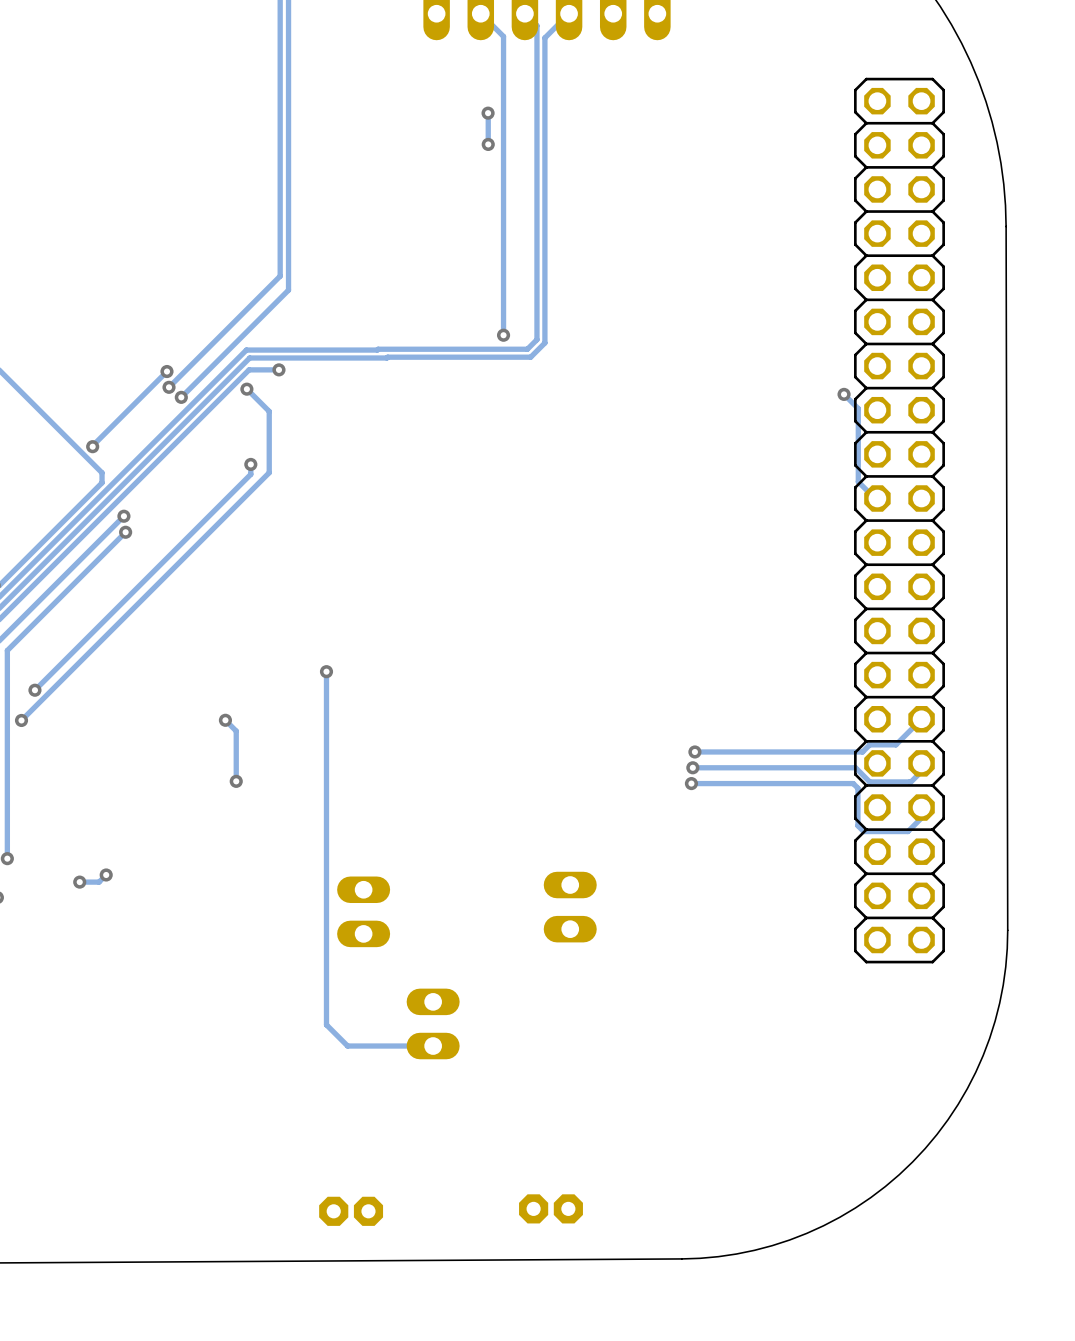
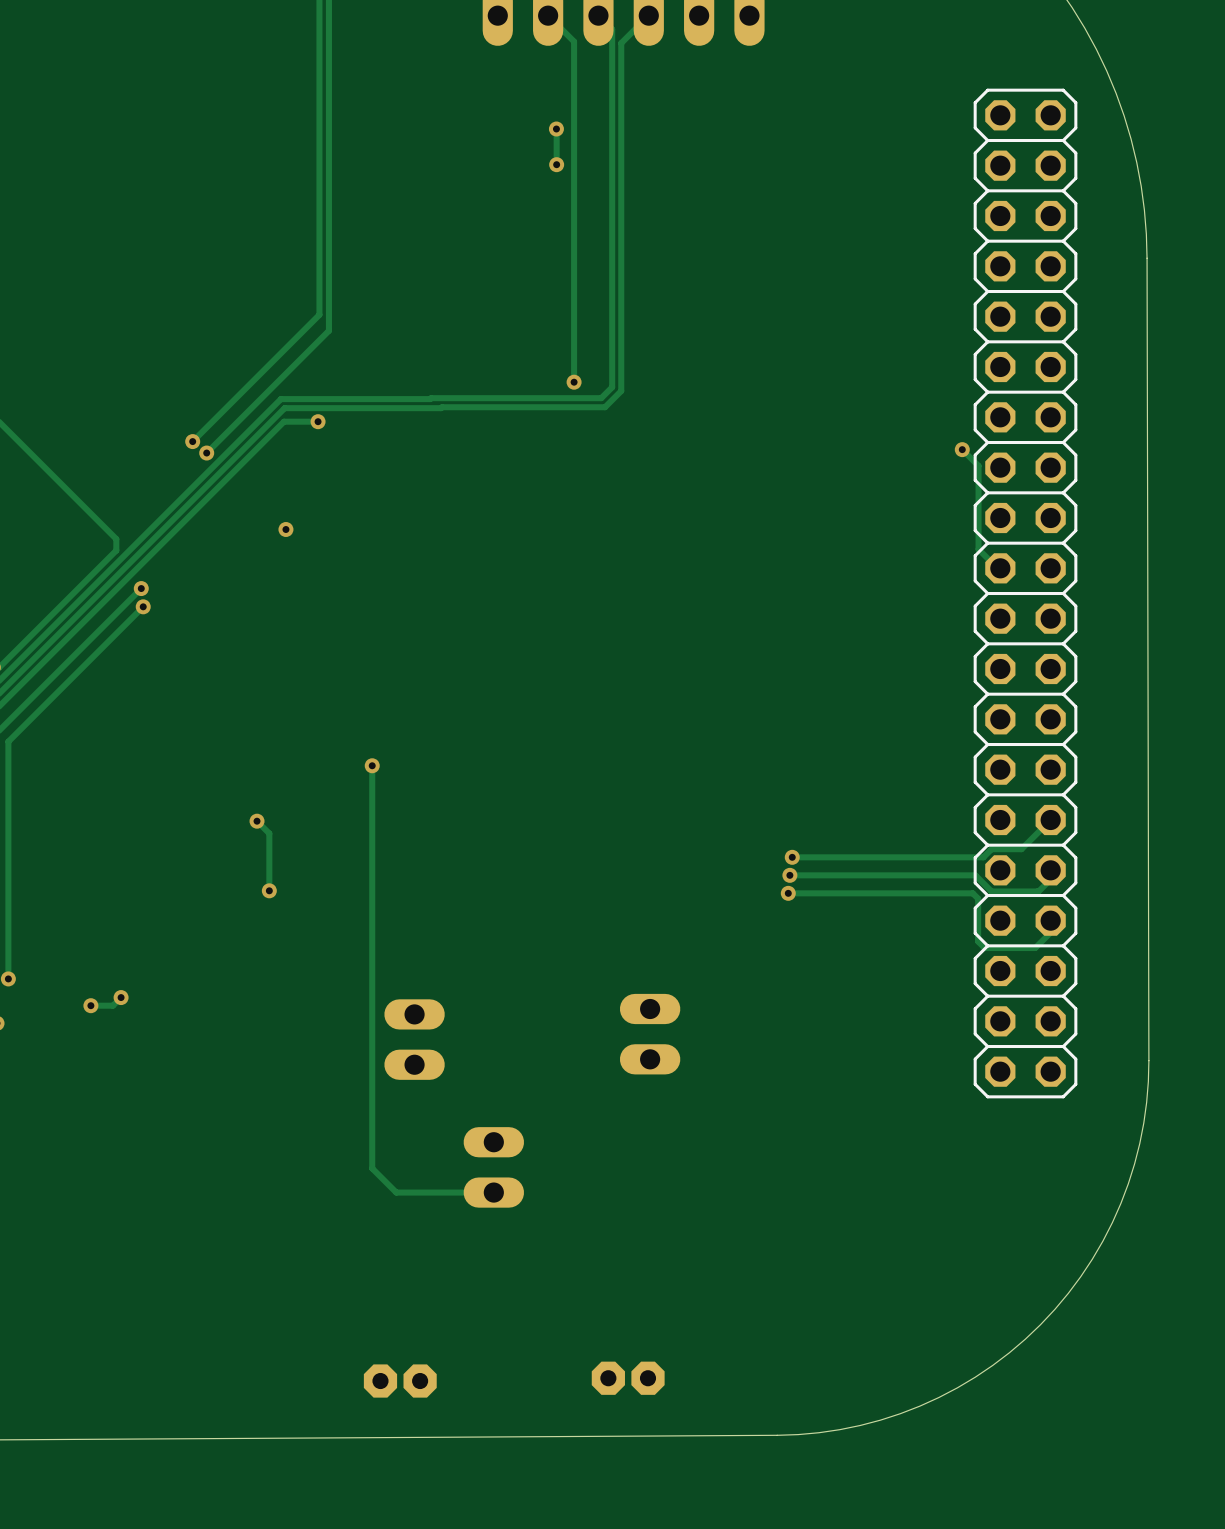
track: (166, 371) (92, 446) -> none
via: (166, 371) -> none
track: (246, 389) (269, 411) (269, 472) (21, 720) -> none
via: (246, 389) -> none
via: (92, 446) -> none
track: (250, 464) (250, 474) (34, 690) -> none
via: (34, 690) -> none
via: (21, 720) -> none

